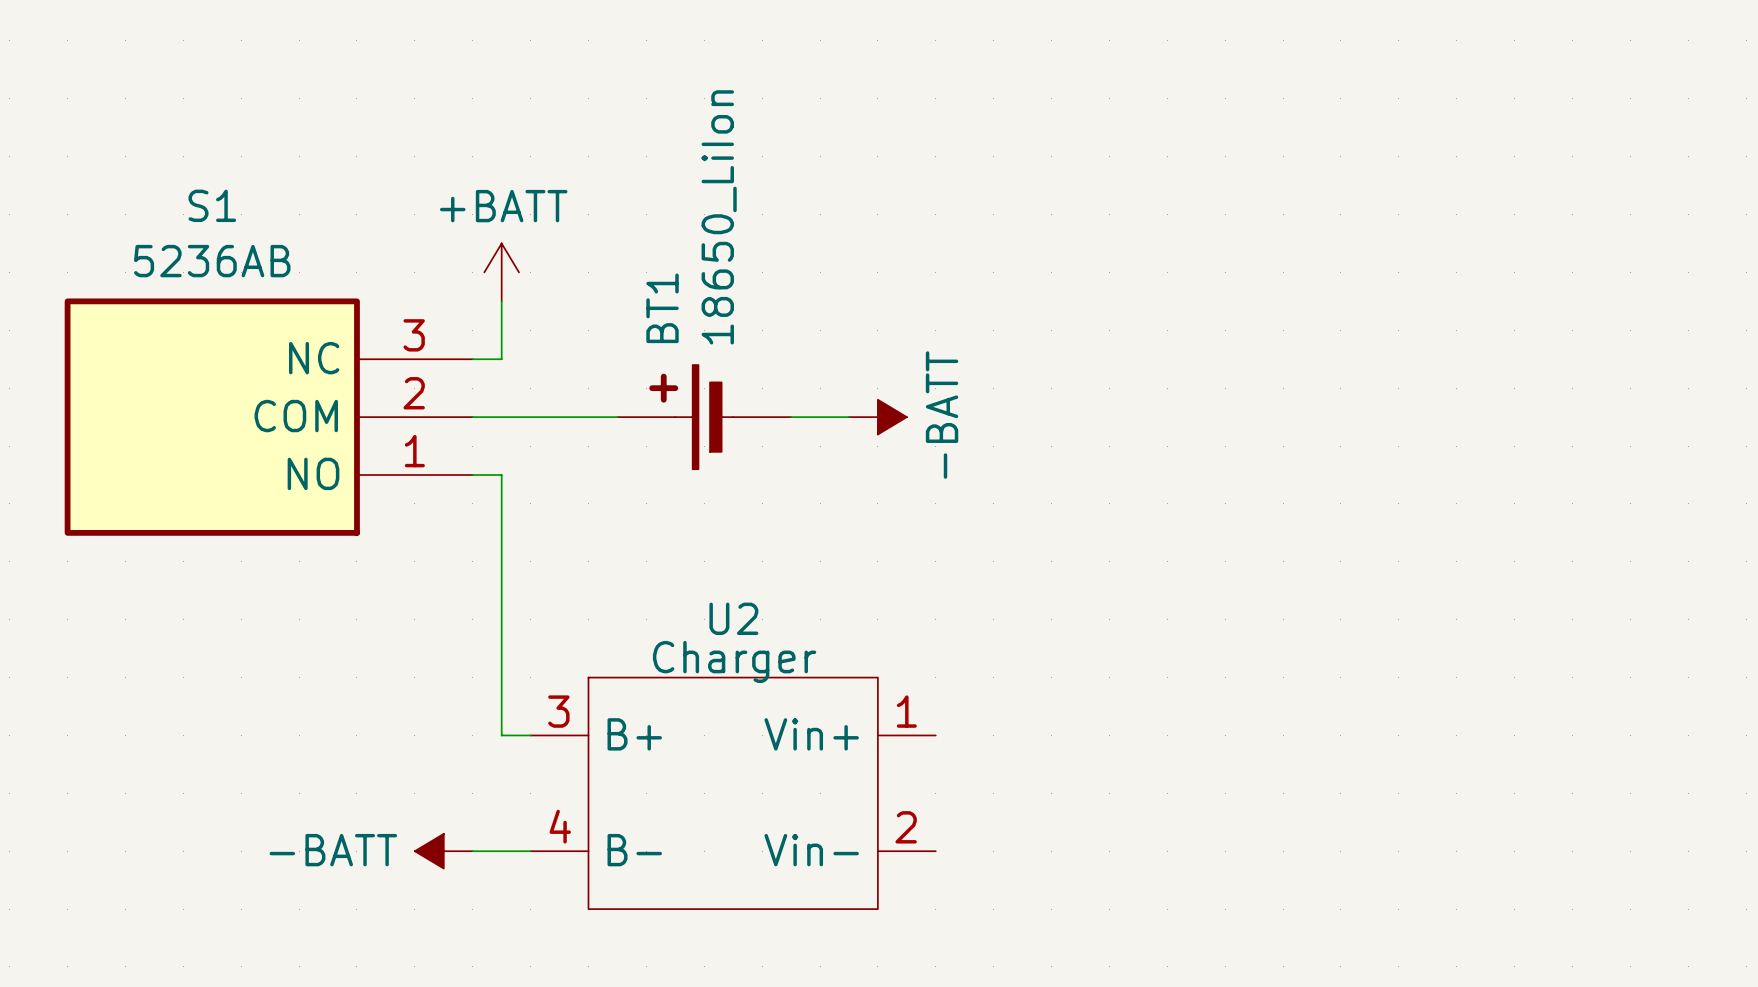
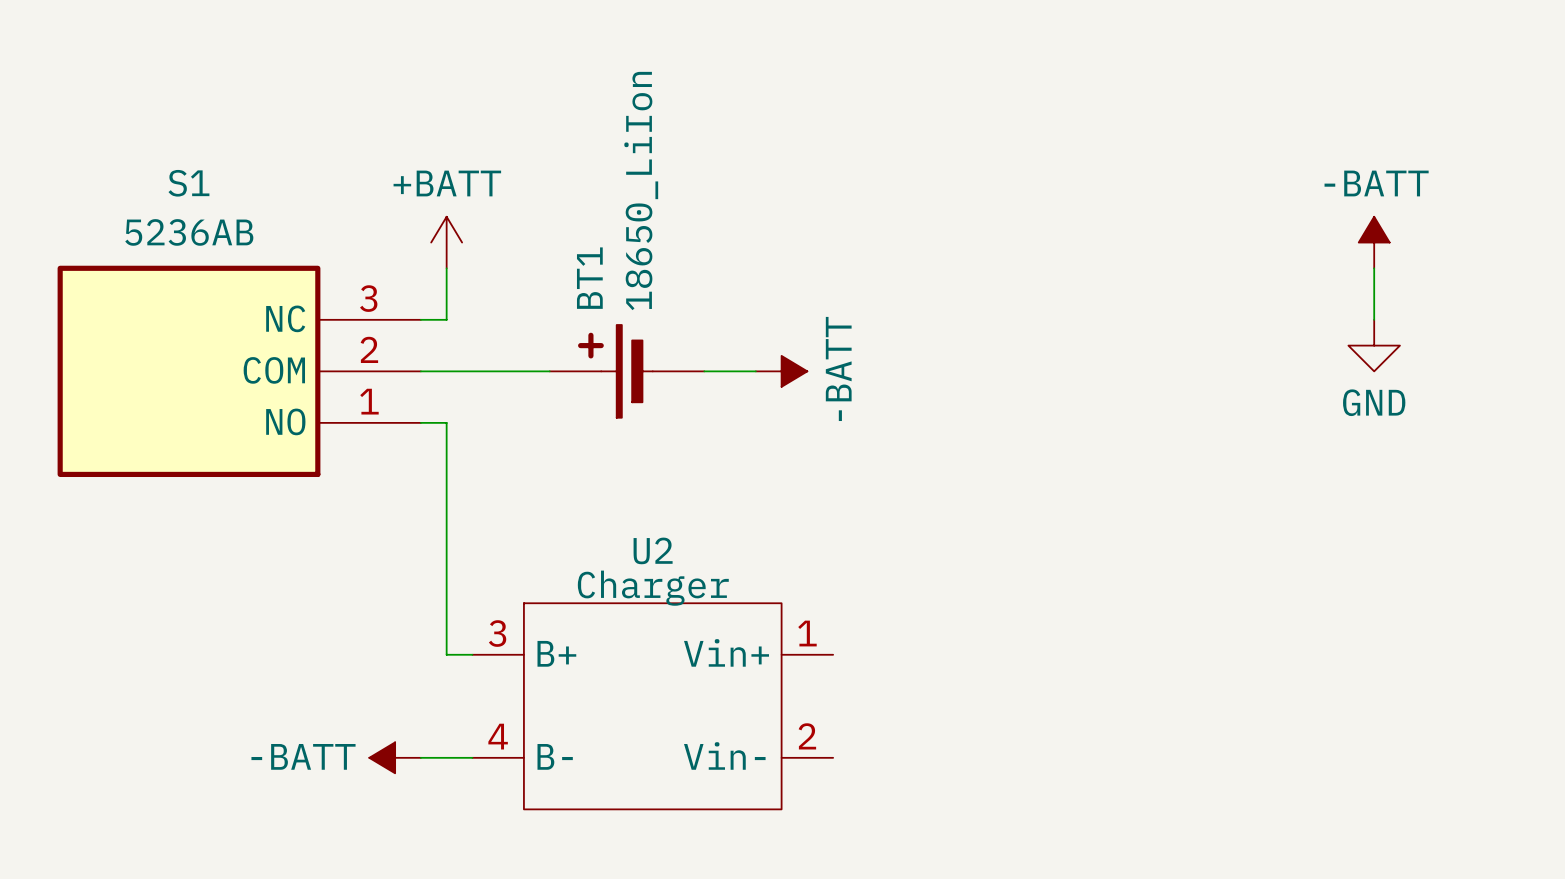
power symbol: none -> -BATT (1374, 242)
wire: none -> (1374, 268) (1374, 319)
power symbol: none -> GND (1374, 345)

